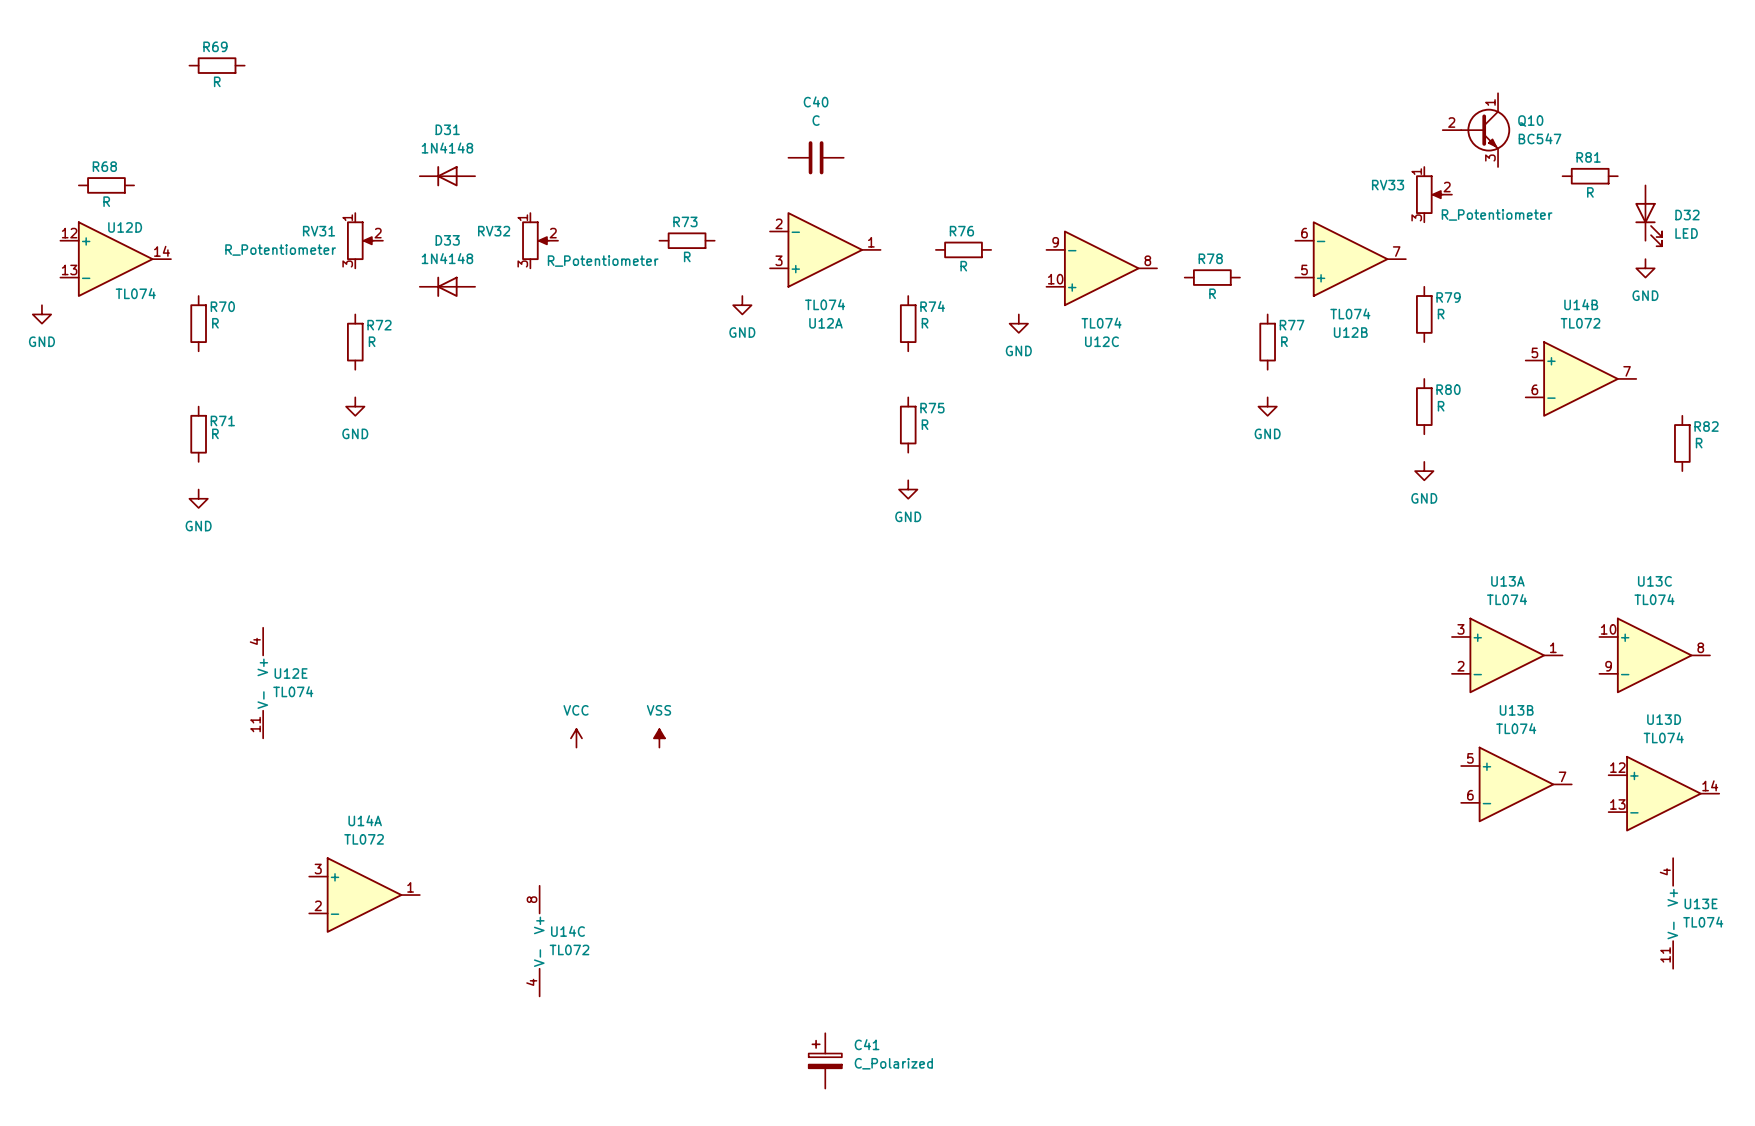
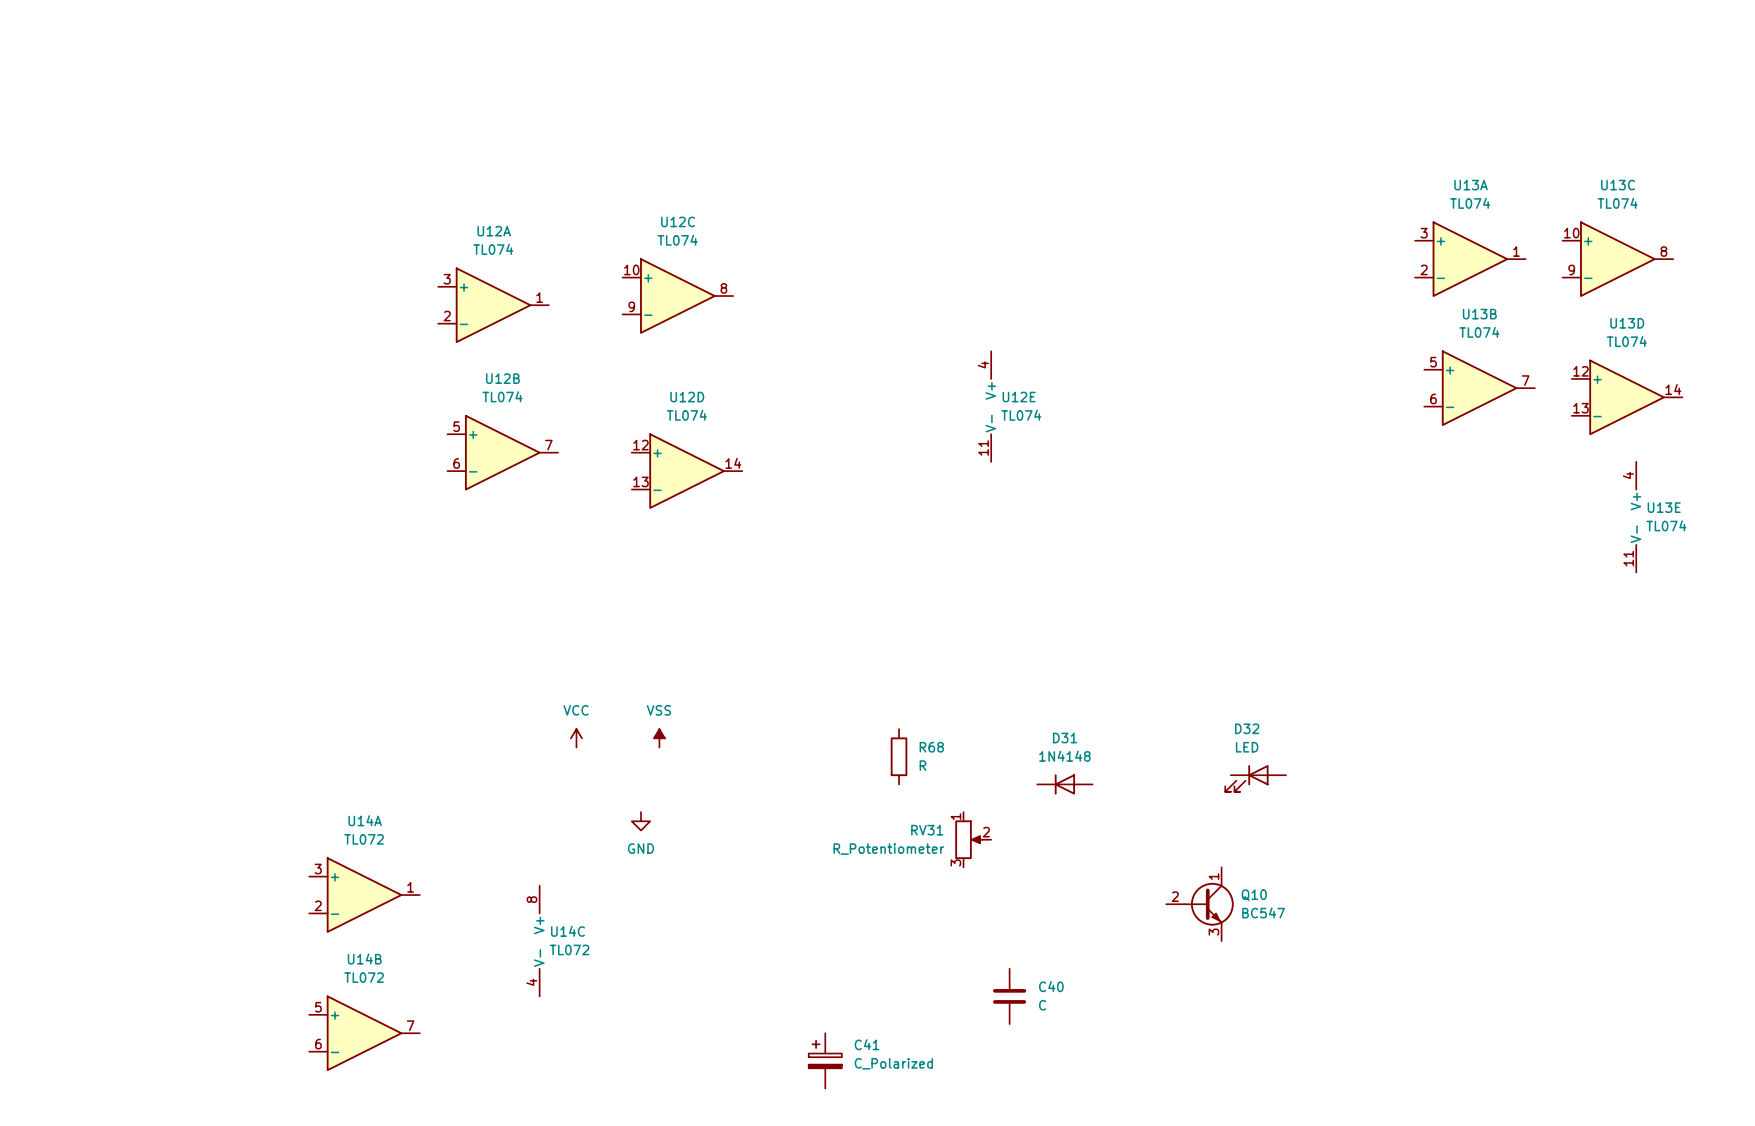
R69: R (217, 65) -> none
C40 name position: C40 (816, 101) -> C40 (1051, 986)
Q10 position: (1476, 130) -> (1200, 904)
C40 rotation: 0° (816, 157) -> 90° clockwise (1009, 996)
C40 position: (816, 157) -> (1009, 996)
R68 name position: R68 (104, 166) -> R68 (931, 747)
D31 position: (447, 176) -> (1064, 784)
R81: R (1590, 176) -> none
R68 rotation: 0° (106, 185) -> 90° clockwise (899, 756)
R68 position: (106, 185) -> (899, 756)
RV33: R_Potentiometer (1433, 194) -> none
R68 value position: R (106, 201) -> R (923, 765)
D32 position: (1648, 215) -> (1255, 778)
D32 name position: D32 (1687, 215) -> D32 (1247, 728)
D32 rotation: 0° (1648, 224) -> 90° clockwise (1246, 778)
U12D name position: U12D (125, 227) -> U12D (687, 397)
D32 value position: LED (1686, 233) -> LED (1247, 747)
RV31 position: (364, 240) -> (973, 839)
RV32: R_Potentiometer (540, 240) -> none
R73: R (687, 240) -> none
U12A flip: as is (825, 249) -> up-down (493, 305)
U12A position: (825, 249) -> (493, 305)
R76: R (963, 249) -> none
U12D position: (115, 259) -> (687, 471)
U12B flip: as is (1350, 259) -> up-down (502, 452)
U12B position: (1350, 259) -> (502, 452)
U12C flip: as is (1101, 268) -> up-down (677, 296)
U12C position: (1101, 268) -> (677, 296)
power symbol: GND (1645, 268) -> none
R78: R (1212, 277) -> none
D33: 1N4148 (447, 286) -> none
U12D value position: TL074 (135, 293) -> TL074 (686, 415)
power symbol: GND (742, 305) -> none
power symbol: GND (41, 314) -> none
R79: R (1424, 314) -> none
R70: R (198, 323) -> none
R74: R (908, 323) -> none
power symbol: GND (1018, 323) -> none
R72: R (355, 342) -> none
R77: R (1267, 342) -> none
U14B position: (1580, 378) -> (364, 1033)
power symbol: GND (355, 406) -> none
power symbol: GND (1267, 406) -> none
R80: R (1424, 406) -> none
R75: R (908, 425) -> none
R71: R (198, 434) -> none
R82: R (1682, 443) -> none
power symbol: GND (1424, 471) -> none
power symbol: GND (908, 489) -> none
power symbol: GND (198, 498) -> none
U13A position: (1507, 655) -> (1470, 259)
U13C position: (1654, 655) -> (1617, 259)
U12E position: (263, 683) -> (991, 406)
U13B position: (1516, 784) -> (1479, 388)
U13D position: (1663, 793) -> (1627, 397)
power symbol: none -> GND (640, 821)
U13E position: (1673, 913) -> (1636, 517)

